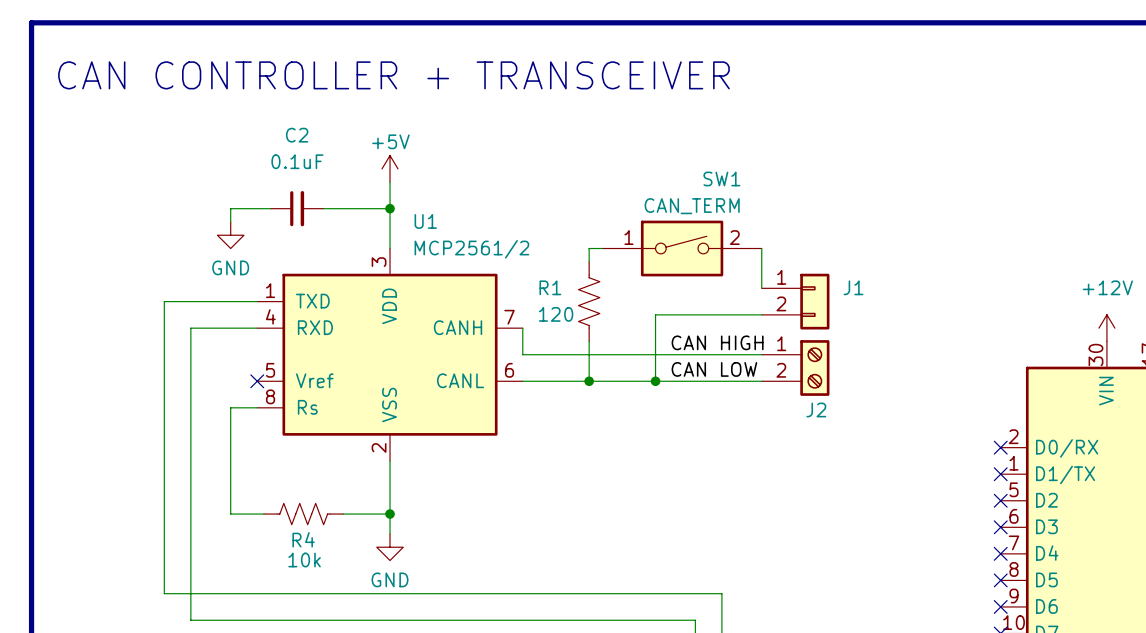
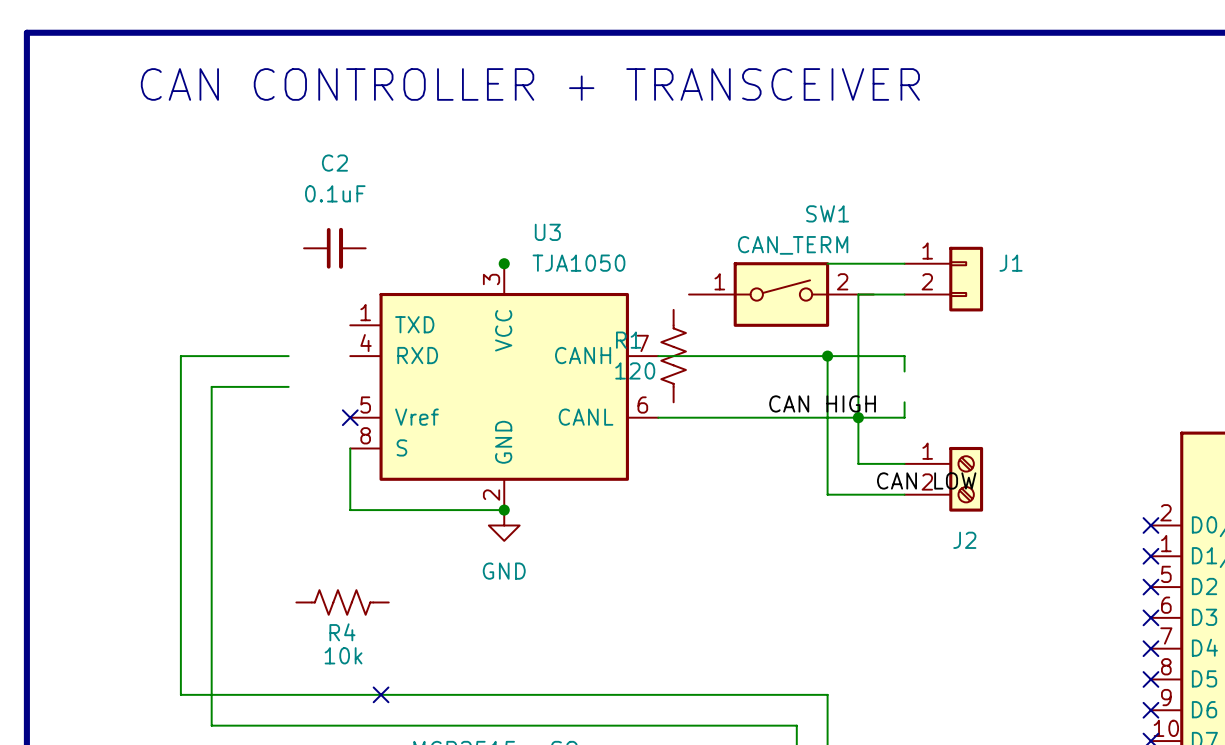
text position: CAN CONTROLLER + TRANSCEIVER (393, 75) -> CAN CONTROLLER + TRANSCEIVER (530, 84)
power symbol: +5V (390, 168) -> none
wire: (390, 182) (390, 248) -> none
wire: (270, 208) (230, 208) (230, 221) -> none
wire: (323, 208) (390, 208) -> none
junction position: (390, 208) -> (504, 263)
wire: none -> (827, 263) (904, 263)
power symbol: GND (230, 235) -> none
wire: (602, 248) (589, 248) (589, 261) -> none
wire: (761, 248) (761, 288) -> none
wire: none -> (904, 294) (858, 294) (858, 463) (904, 463)
wire: none -> (658, 356) (904, 356) (904, 371)
wire: none -> (827, 356) (827, 494) (904, 494)
junction: none -> (827, 356)
J1 position: (795, 301) -> (943, 279)
wire: (761, 314) (655, 314) (655, 381) -> none
U3: none -> TJA1050 (504, 386)
wire: (589, 341) (589, 381) -> none
wire: none -> (904, 402) (904, 417) (873, 417)
U1: MCP2561/2 (390, 354) -> none
junction: none -> (858, 417)
J2 position: (795, 367) -> (943, 479)
label position: CAN LOW (714, 369) -> CAN LOW (926, 480)
no-connect mark position: (257, 381) -> (350, 417)
wire: (522, 381) (761, 381) -> none
junction: (589, 381) -> none
junction: (655, 381) -> none
wire: (257, 407) (230, 407) (230, 514) (263, 514) -> none
J2 name position: J2 (816, 409) -> J2 (964, 540)
junction: none -> (504, 510)
wire: (390, 460) (390, 533) -> none
wire: (343, 514) (390, 514) -> none
junction: (390, 514) -> none
power symbol position: GND (390, 547) -> GND (504, 525)
power symbol text position: GND (390, 579) -> GND (504, 571)
no-connect mark: none -> (381, 694)

